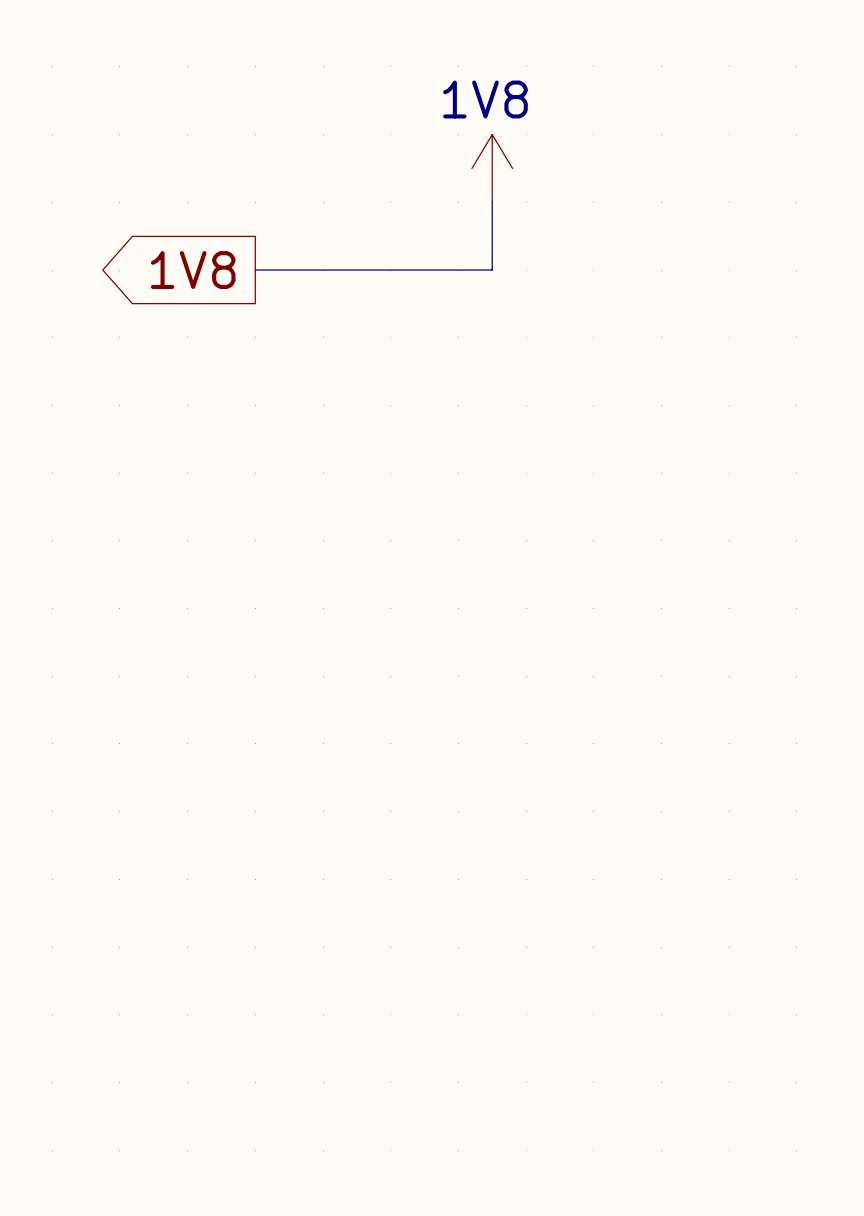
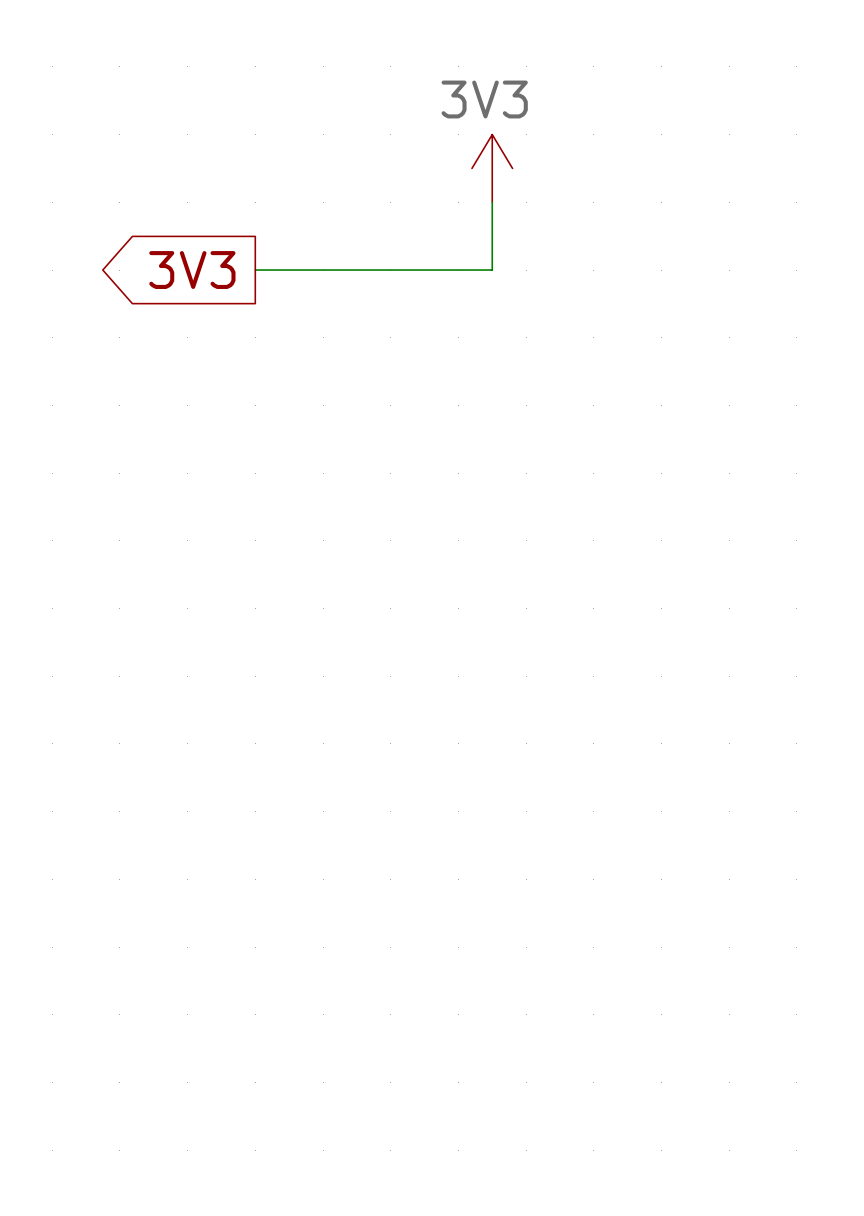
power symbol: 1V8 (492, 168) -> 3V3 (492, 168)
global label: 1V8 (193, 270) -> 3V3 (192, 270)

